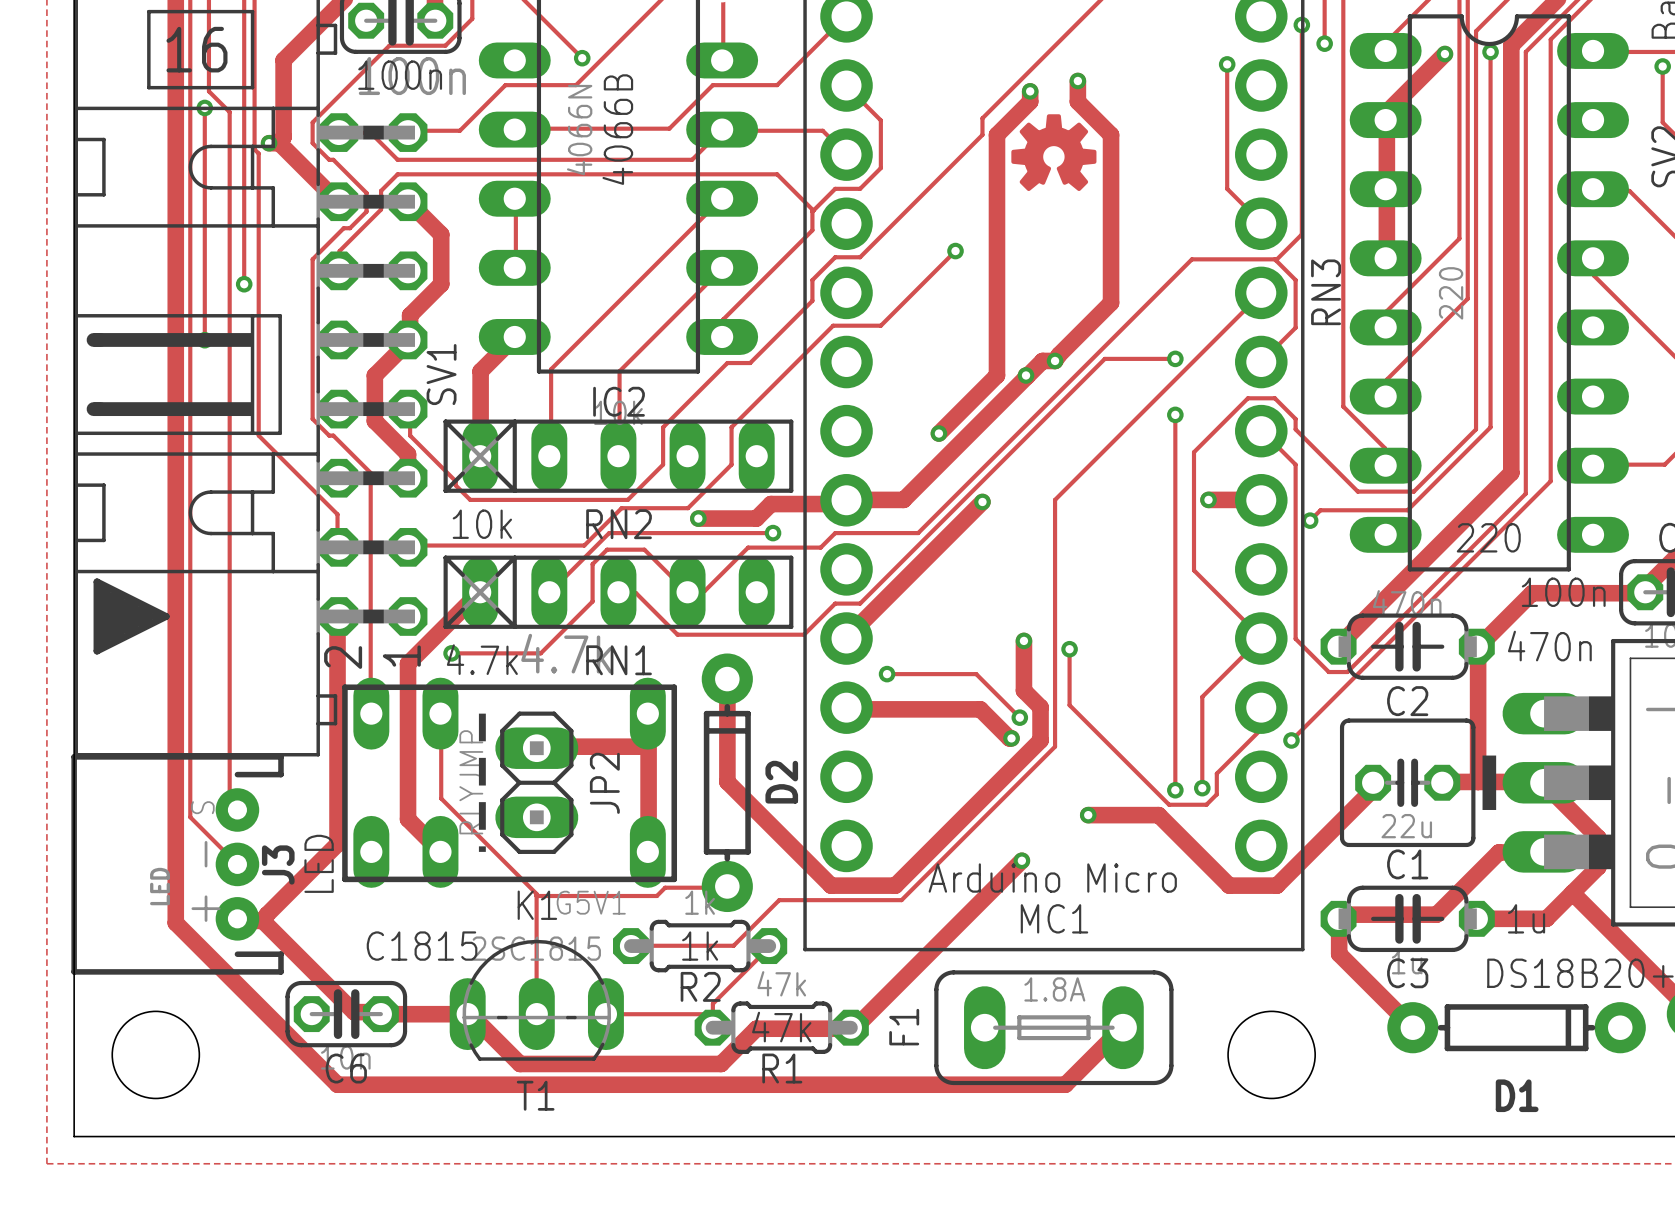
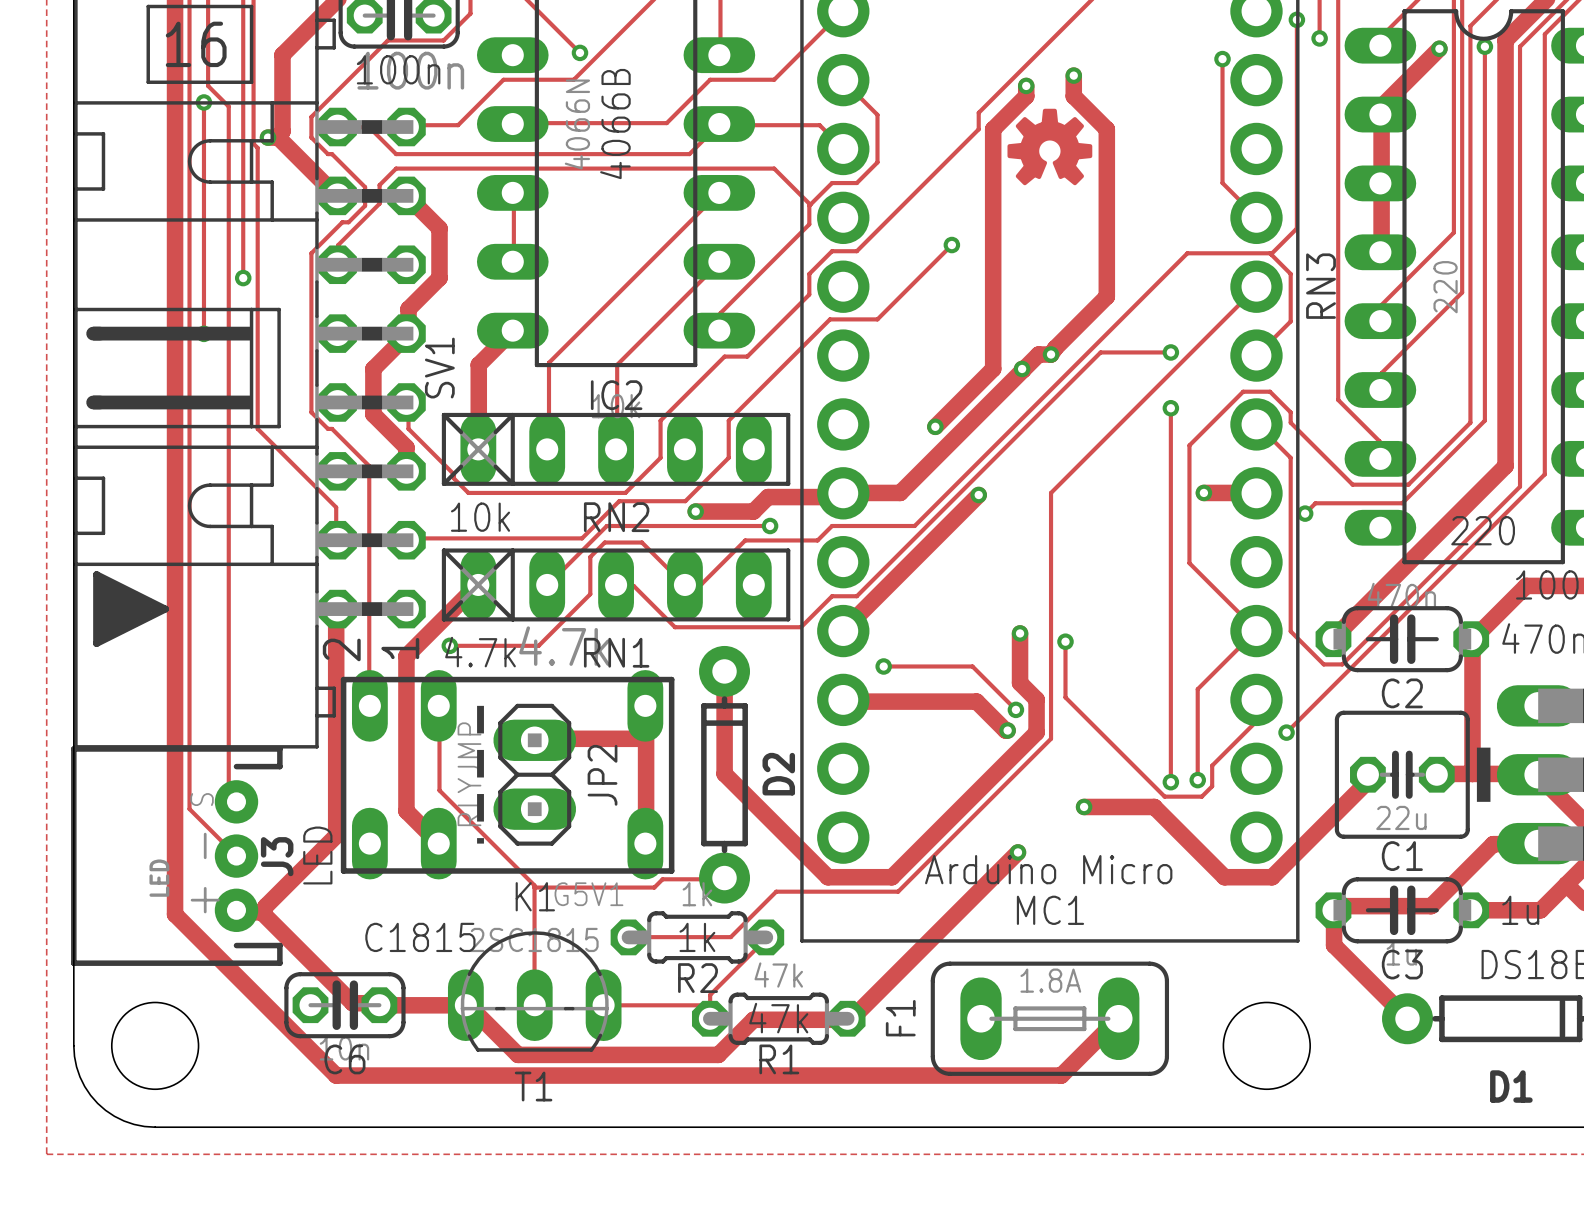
board edge: (74, 1054) (74, 1136) (155, 1136) -> (73, 1045) (80, 1076) (97, 1103) (124, 1121) (155, 1127)

